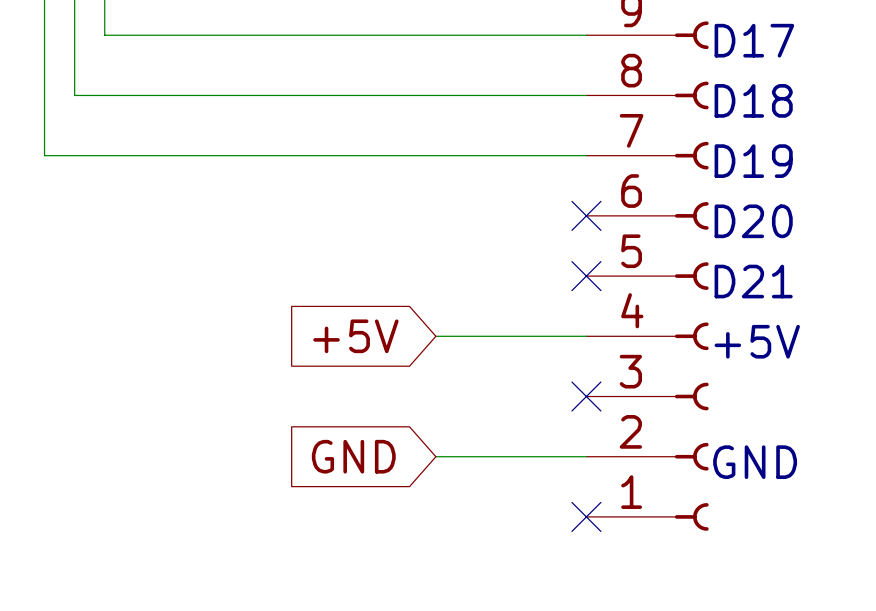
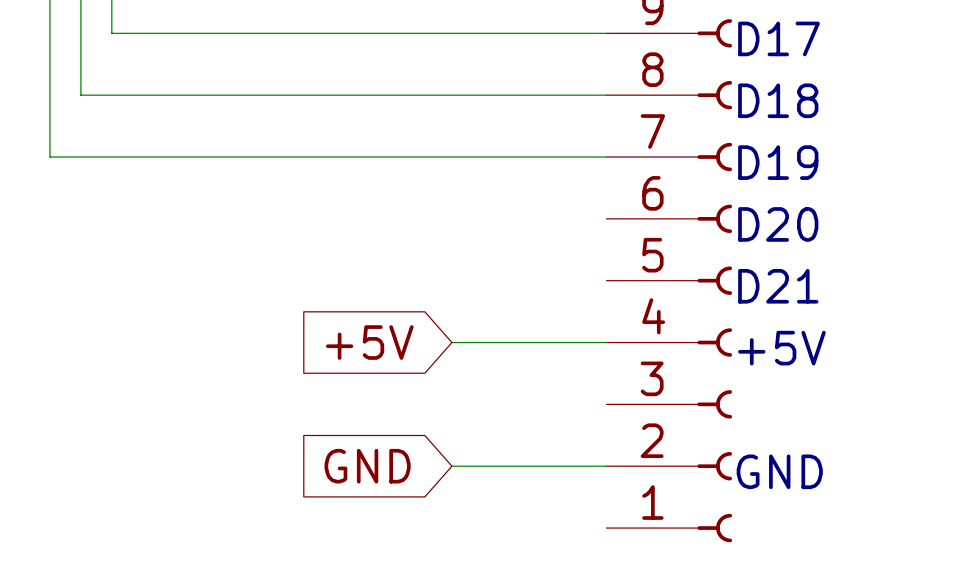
no-connect mark: (586, 215) -> none
no-connect mark: (586, 276) -> none
no-connect mark: (586, 396) -> none
no-connect mark: (586, 516) -> none

